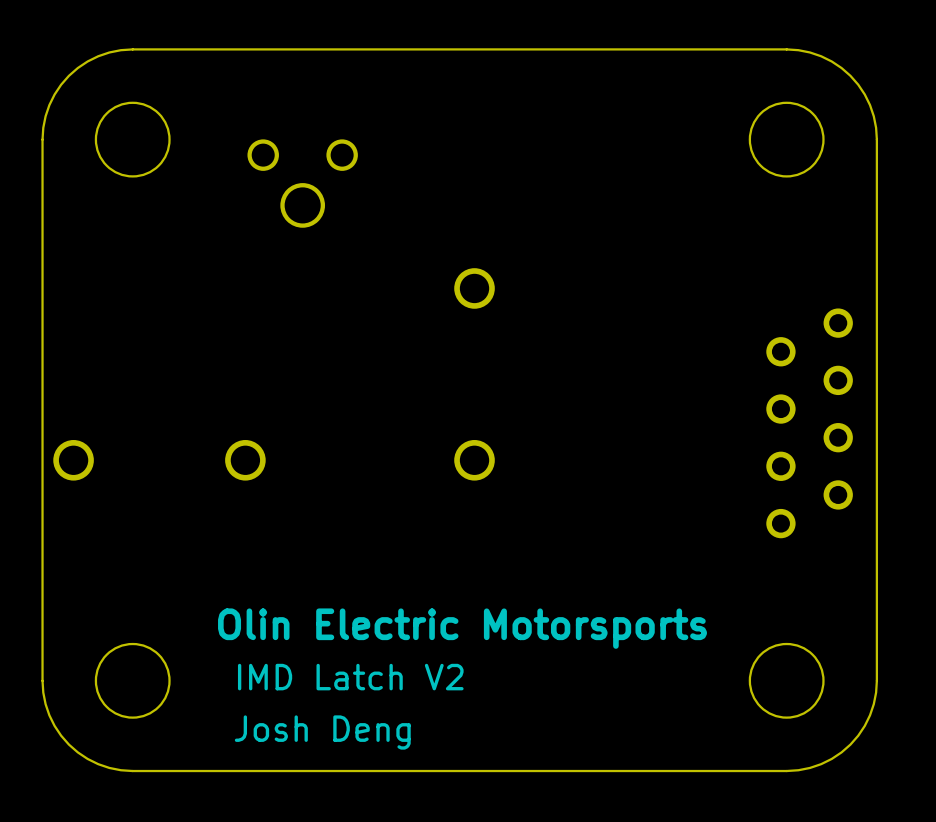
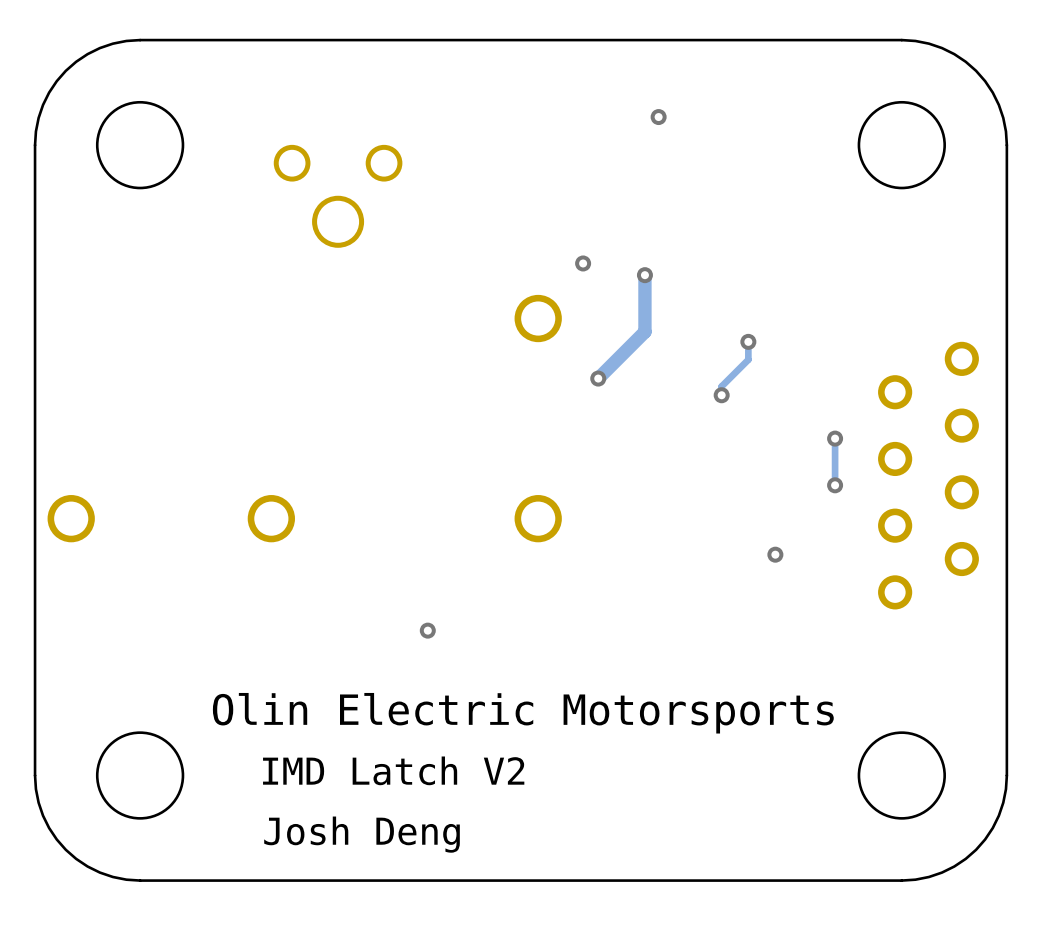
via: none -> (658, 117)
via: none -> (583, 263)
track: none -> (644, 275) (644, 331) (598, 378)
via: none -> (644, 275)
track: none -> (748, 341) (748, 359) (721, 386) (721, 395)
via: none -> (748, 341)
via: none -> (598, 378)
via: none -> (721, 395)
track: none -> (835, 438) (835, 485)
via: none -> (835, 438)
via: none -> (835, 485)
via: none -> (775, 554)
via: none -> (427, 630)

